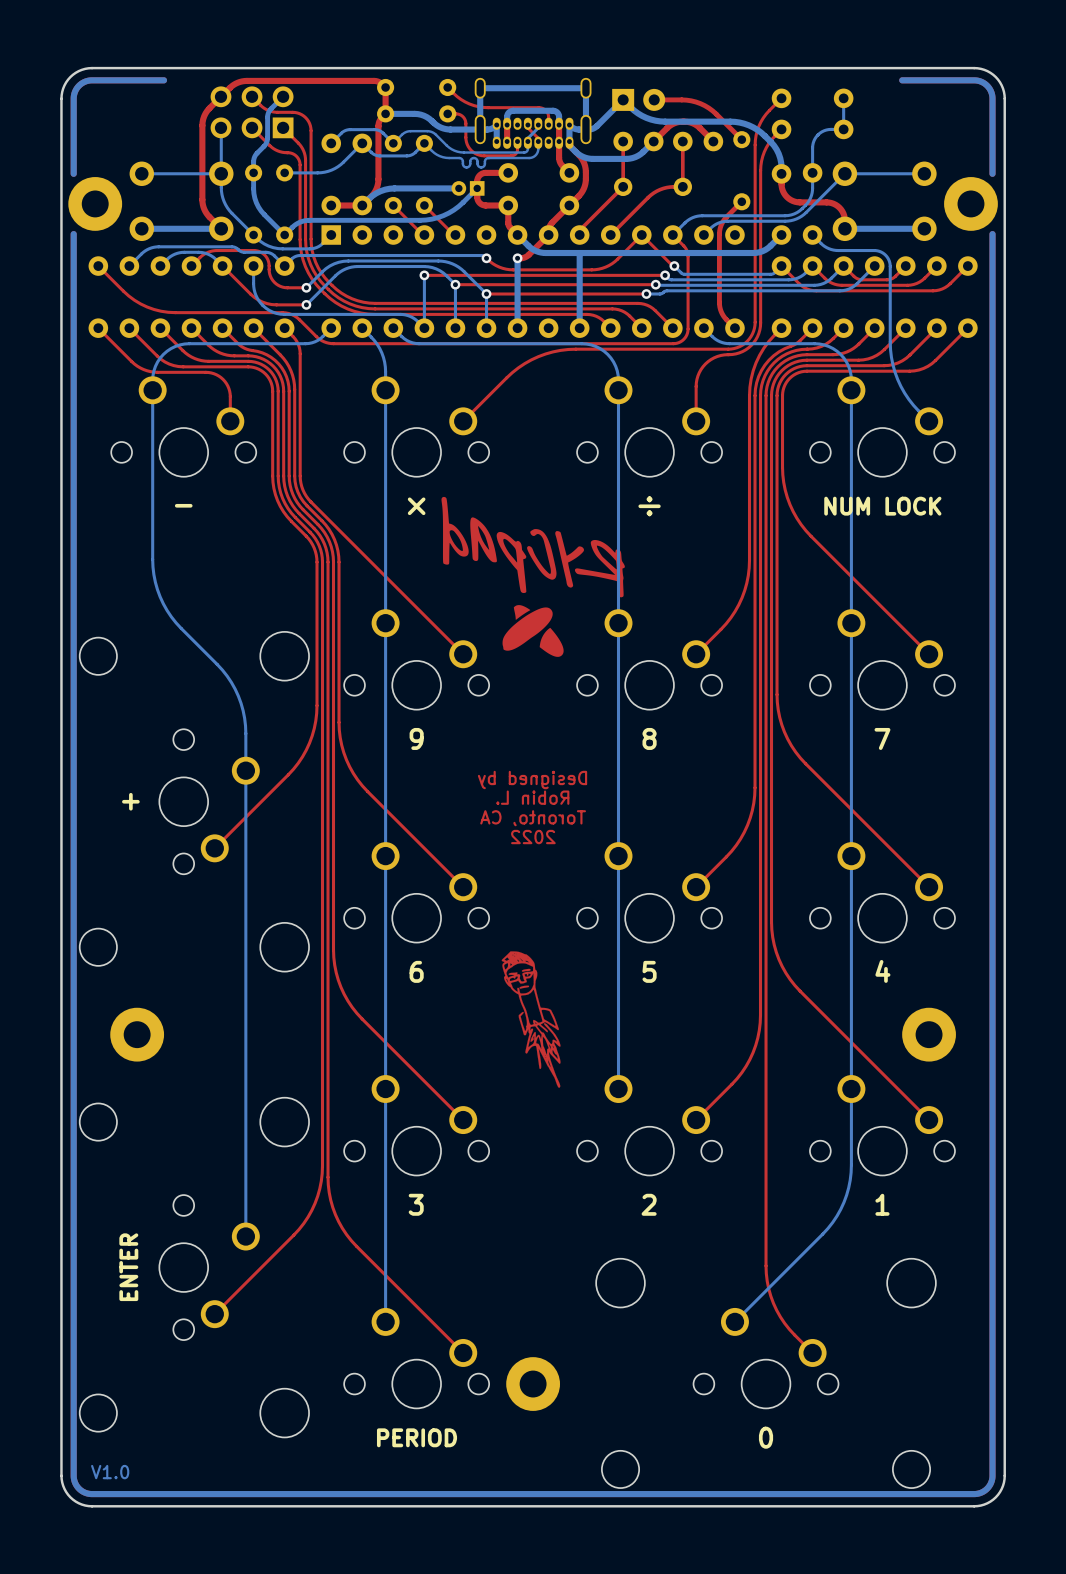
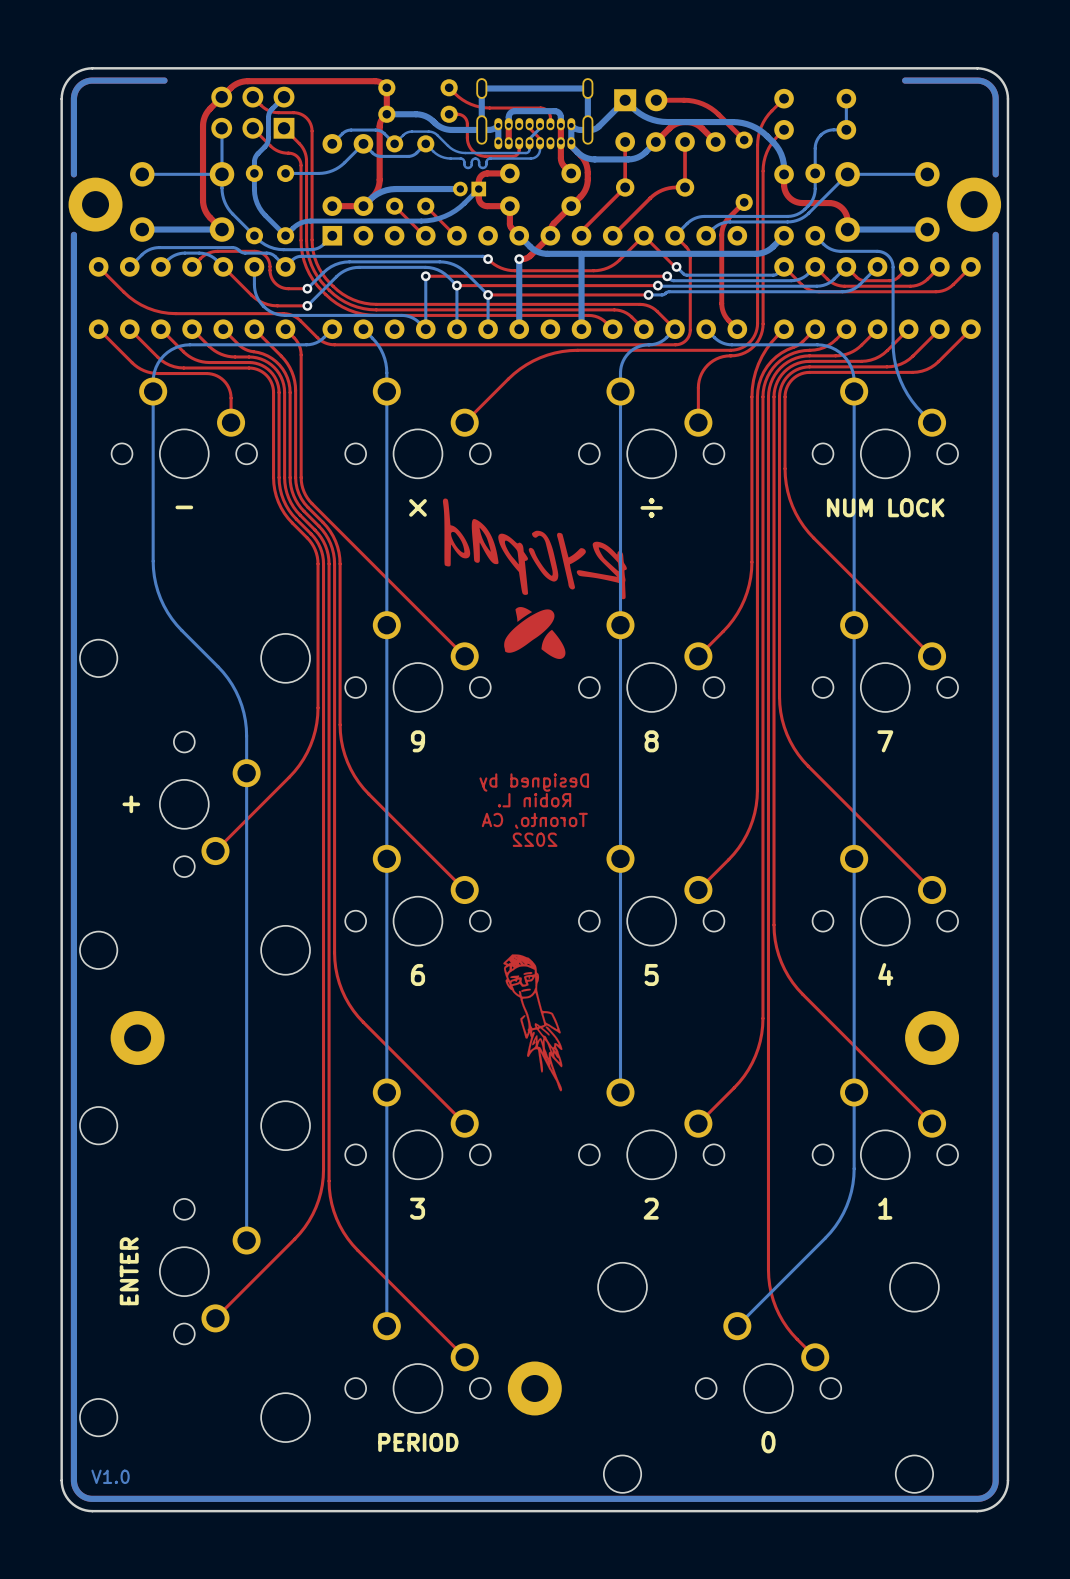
bottom track: (393, 328) (404, 338) (415, 343) (591, 344) (600, 348) (610, 358) (615, 366) (618, 380) -> (675, 329) (661, 341) (639, 346) (628, 353) (622, 363) (620, 381)

